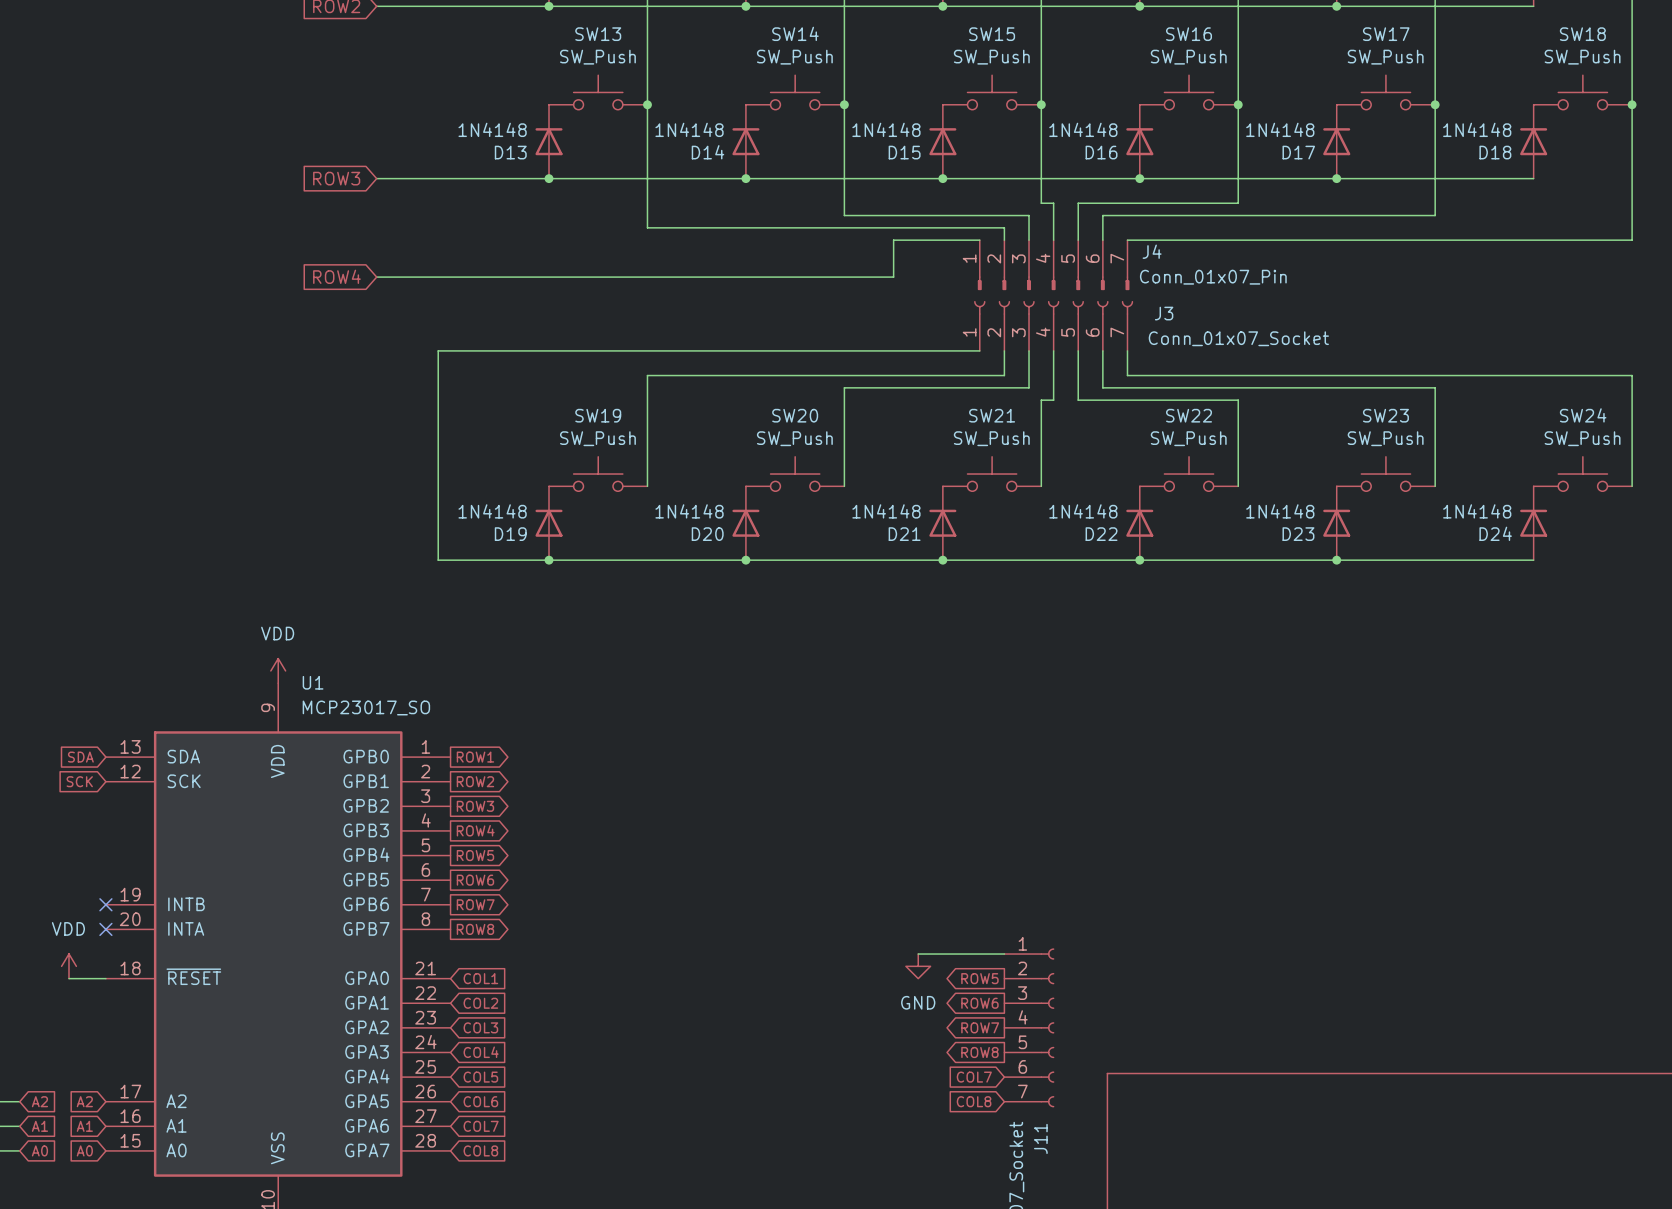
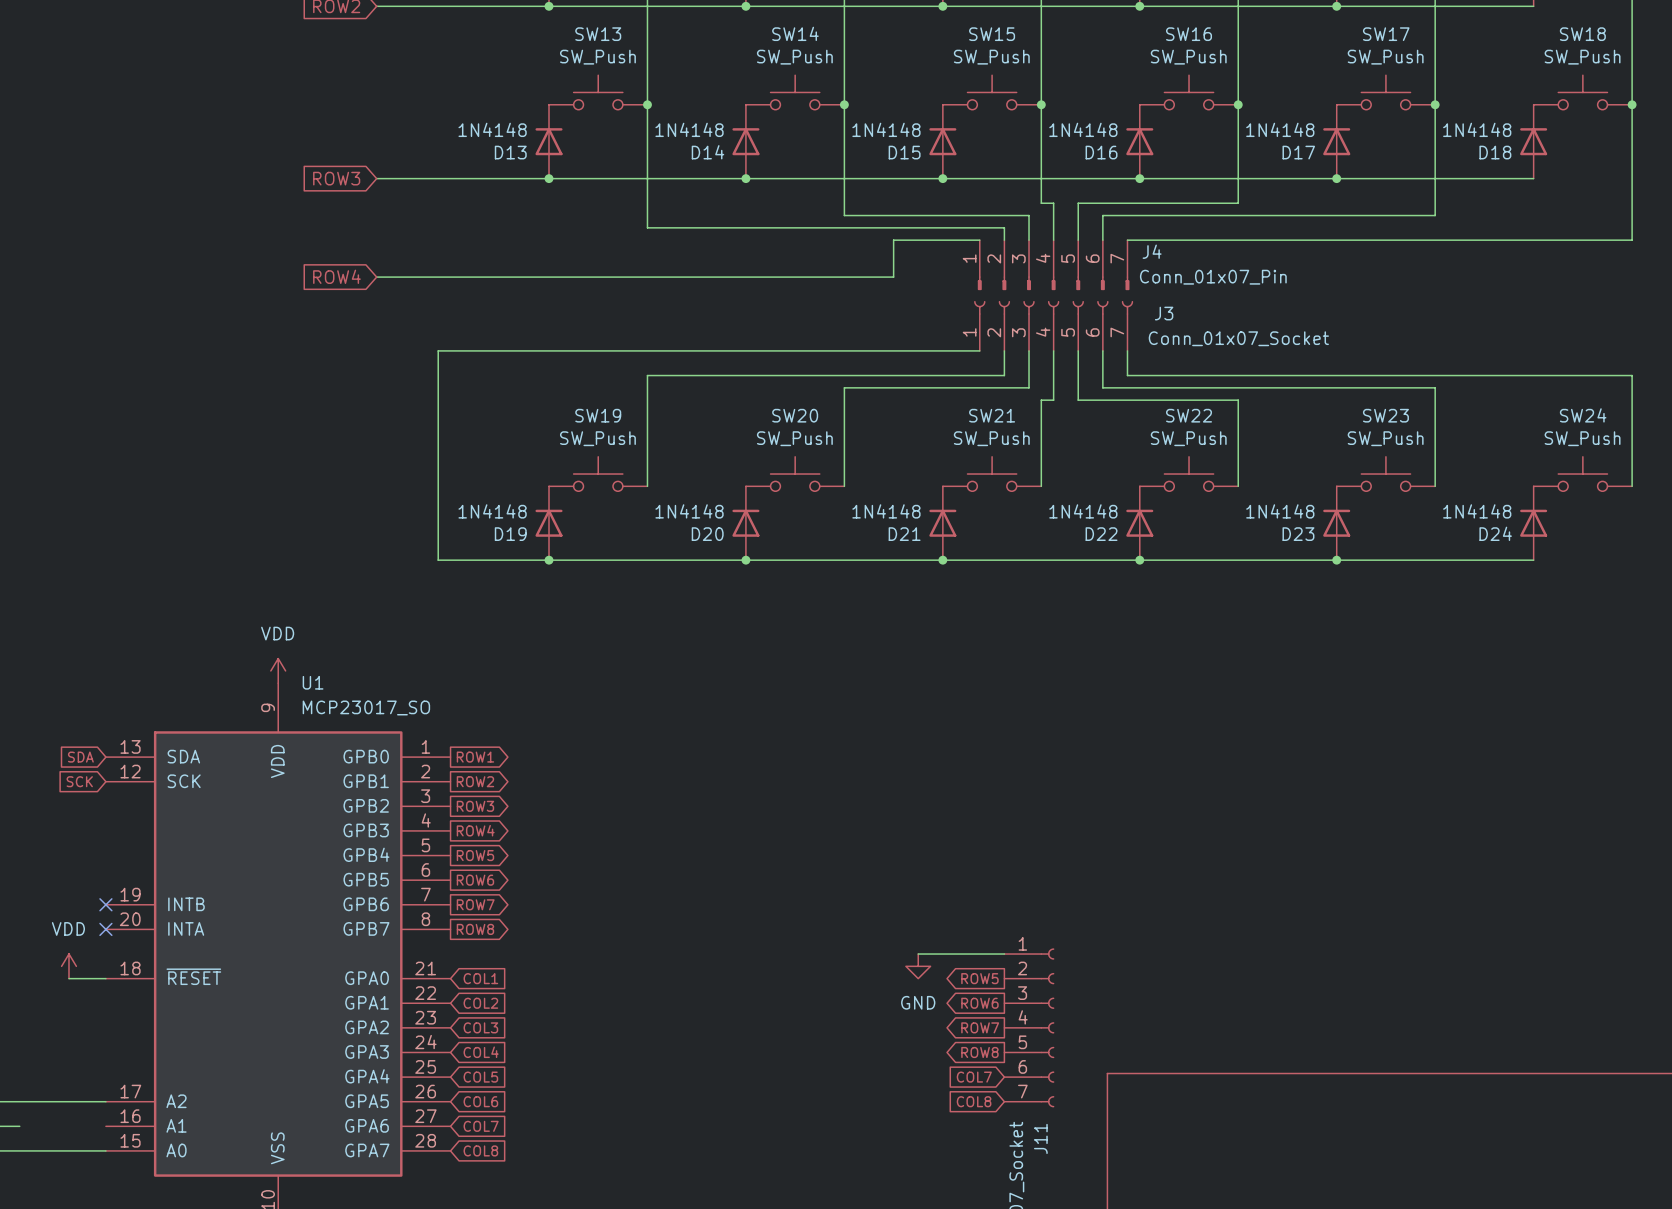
wire: none -> (19, 1101) (105, 1101)
global label: A2 (39, 1101) -> none
global label: A2 (84, 1101) -> none
global label: A1 (39, 1126) -> none
global label: A1 (84, 1126) -> none
wire: none -> (19, 1150) (105, 1150)
global label: A0 (39, 1150) -> none
global label: A0 (84, 1150) -> none

